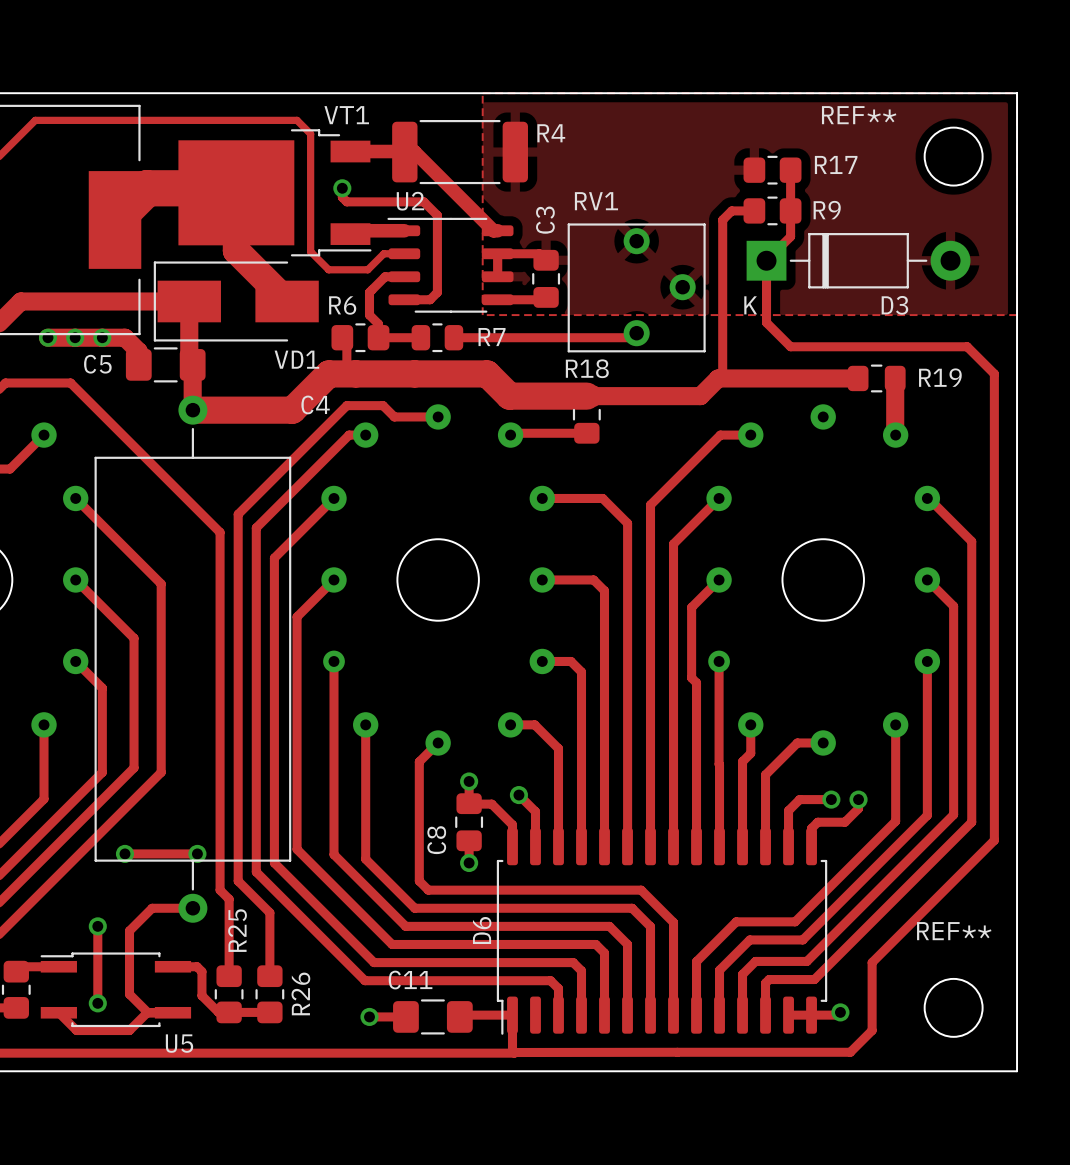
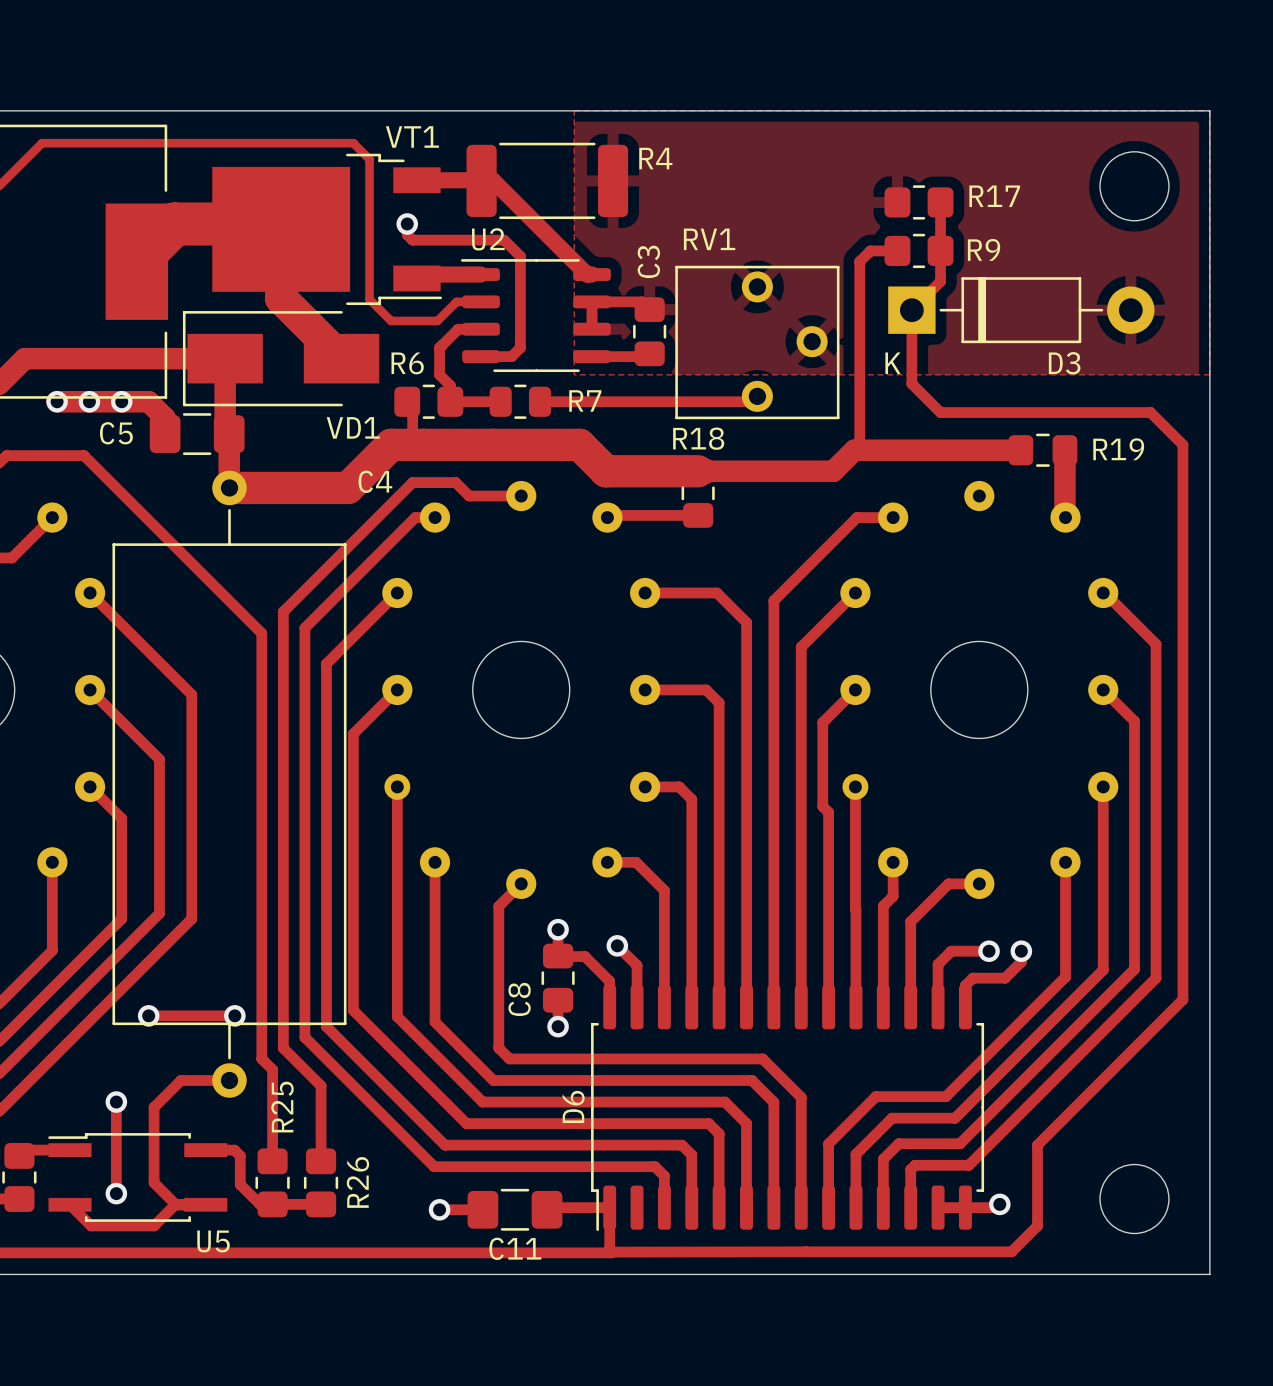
REF** name: REF** (859, 115) -> none
REF** name: REF** (954, 931) -> none
C11 name position: C11 (410, 980) -> C11 (515, 1248)

